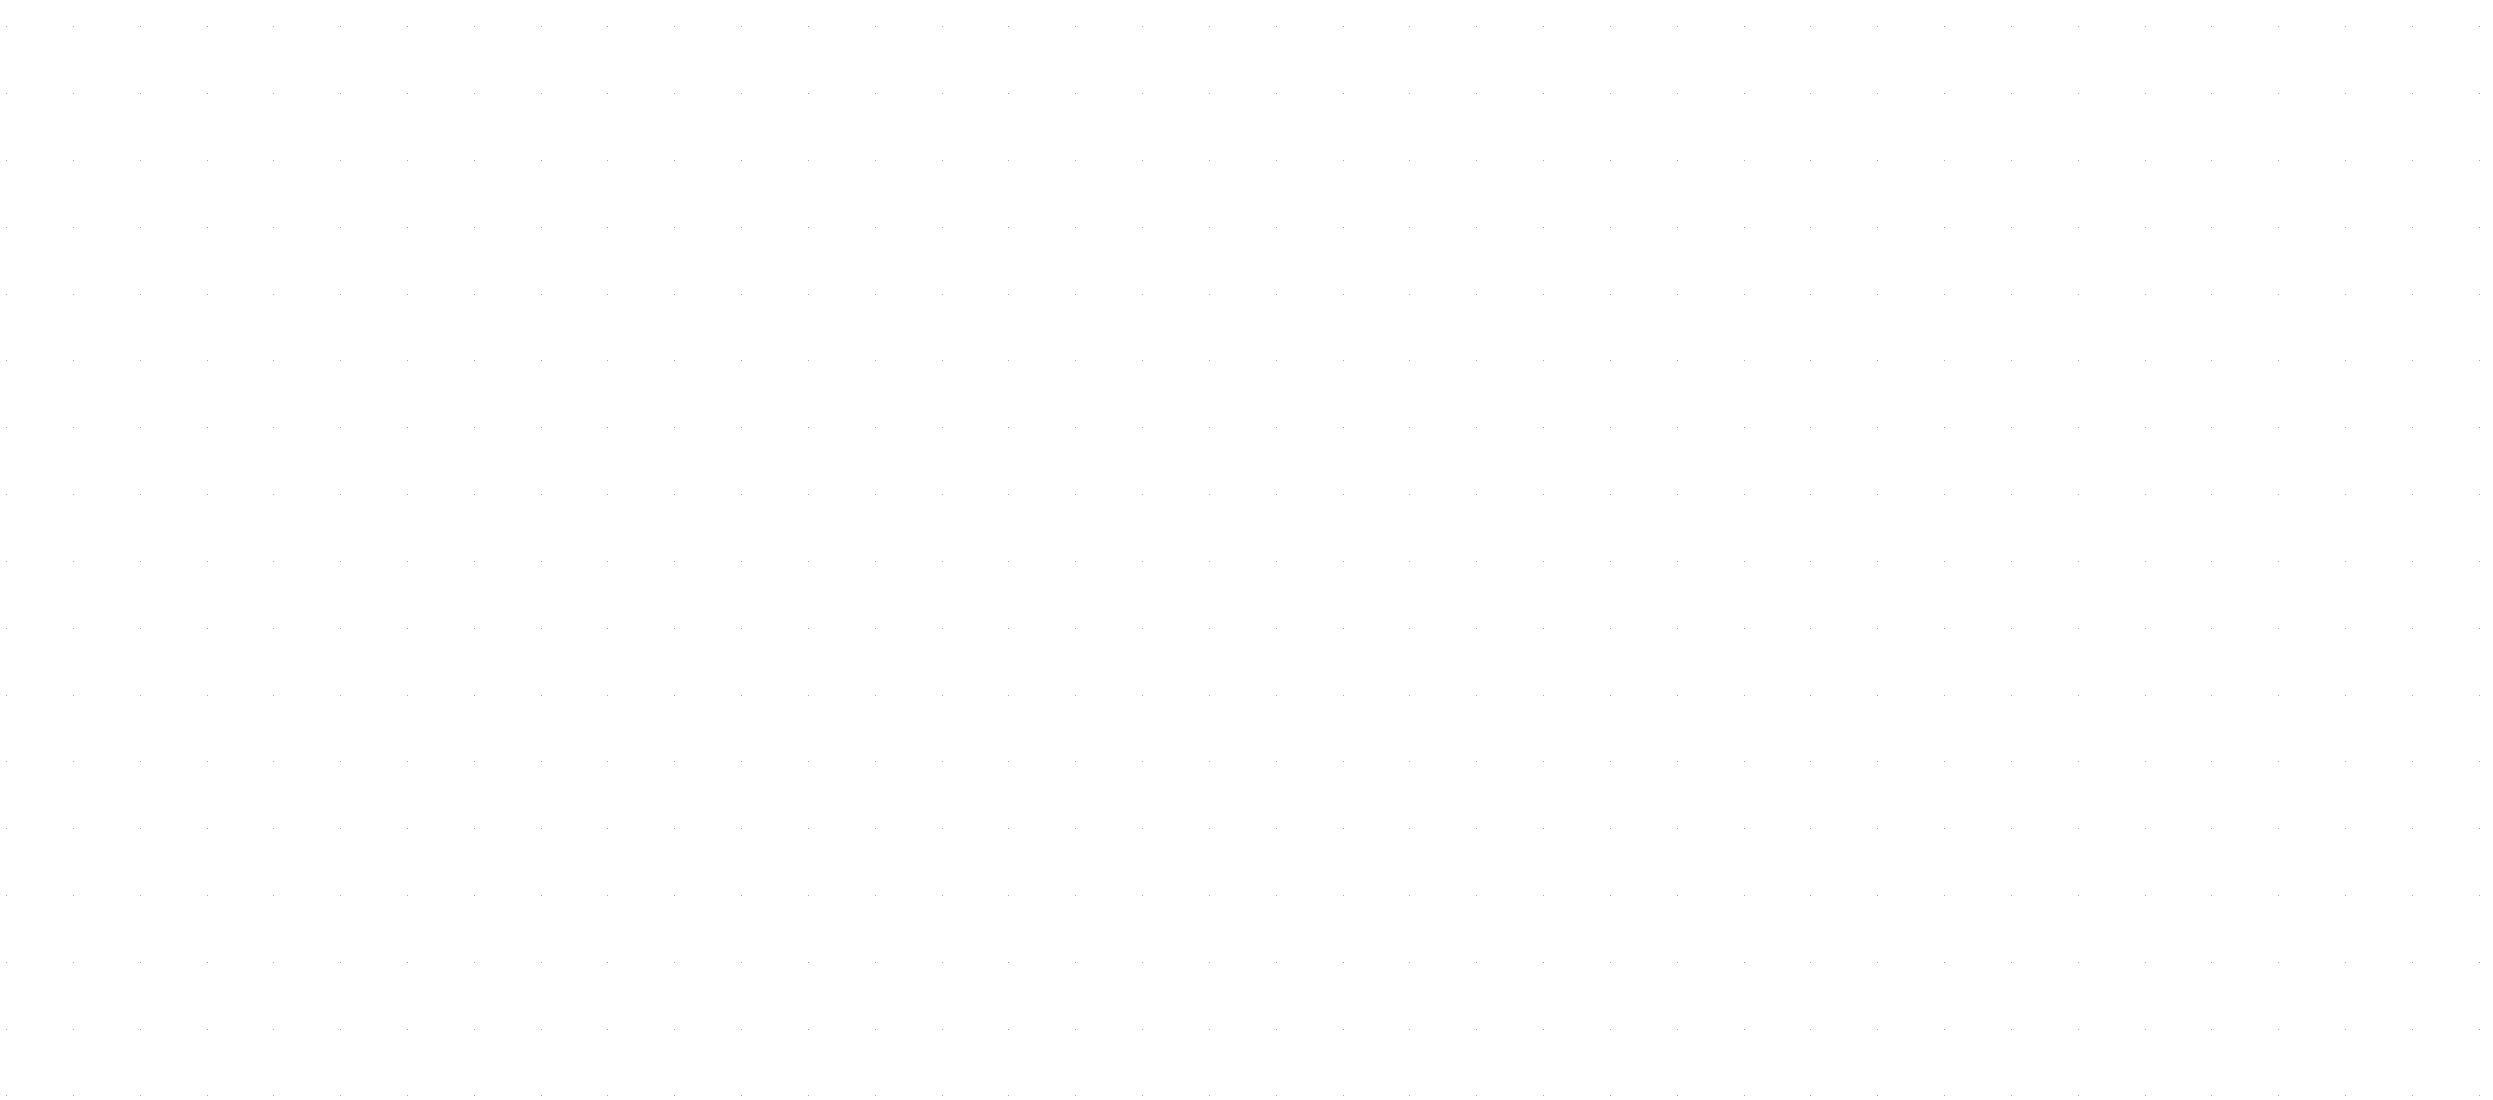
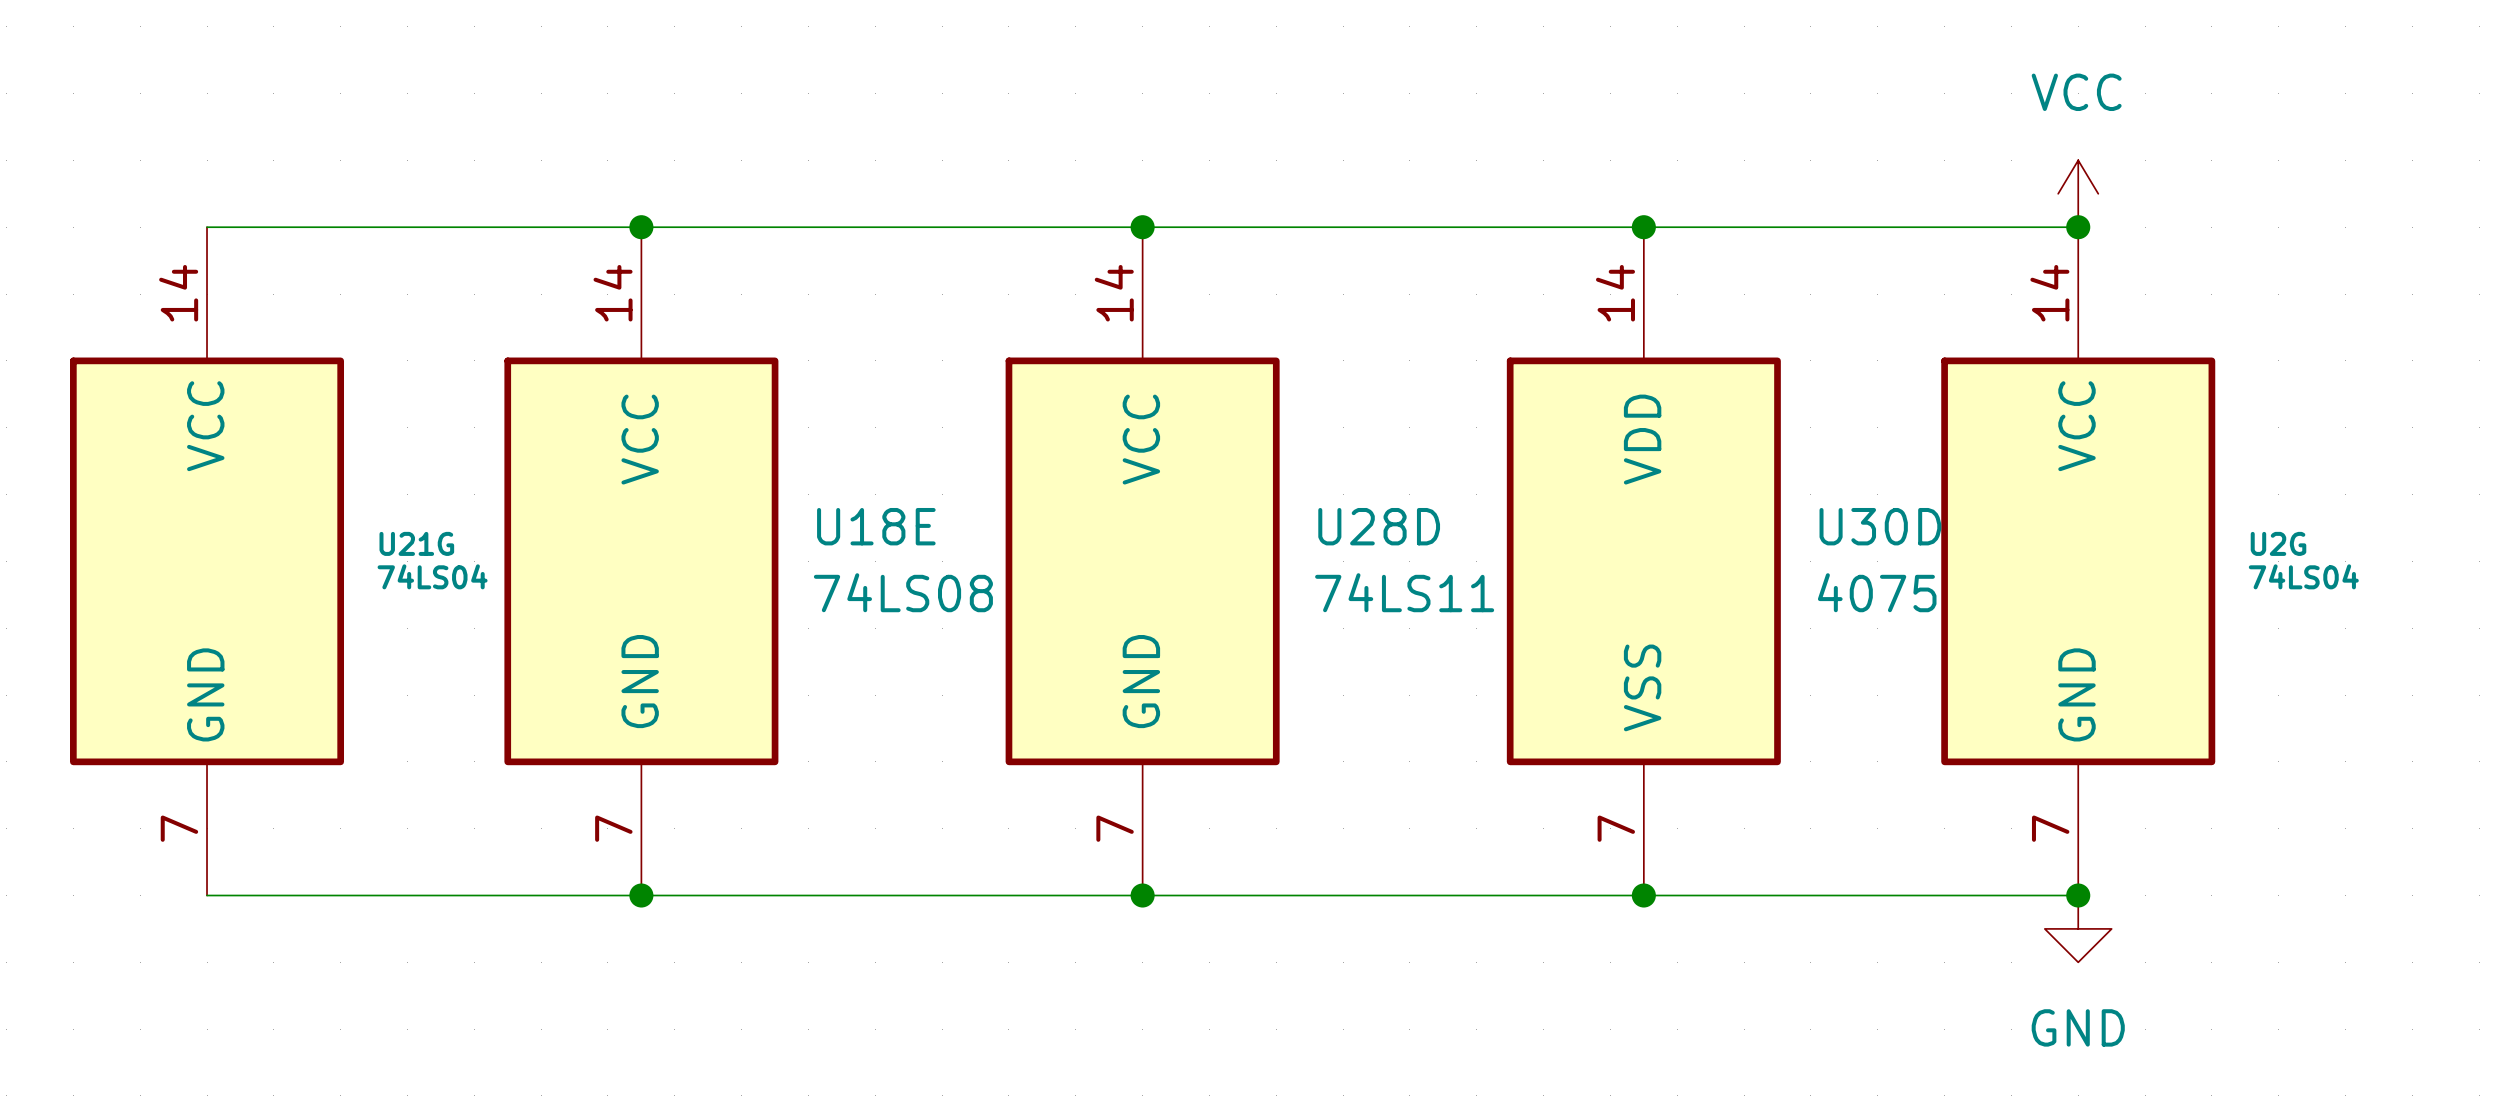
power symbol: none -> VCC (2078, 193)
wire: none -> (207, 227) (2078, 227)
junction: none -> (641, 227)
junction: none -> (1142, 227)
junction: none -> (1643, 227)
junction: none -> (2078, 227)
U21G: none -> 74LS04 (207, 561)
U18E: none -> 74LS08 (641, 561)
U28D: none -> 74LS11 (1142, 561)
U30D: none -> 4075 (1643, 561)
U2G: none -> 74LS04 (2078, 561)
wire: none -> (207, 895) (2078, 895)
junction: none -> (641, 895)
junction: none -> (1142, 895)
junction: none -> (1643, 895)
junction: none -> (2078, 895)
power symbol: none -> GND (2078, 928)

